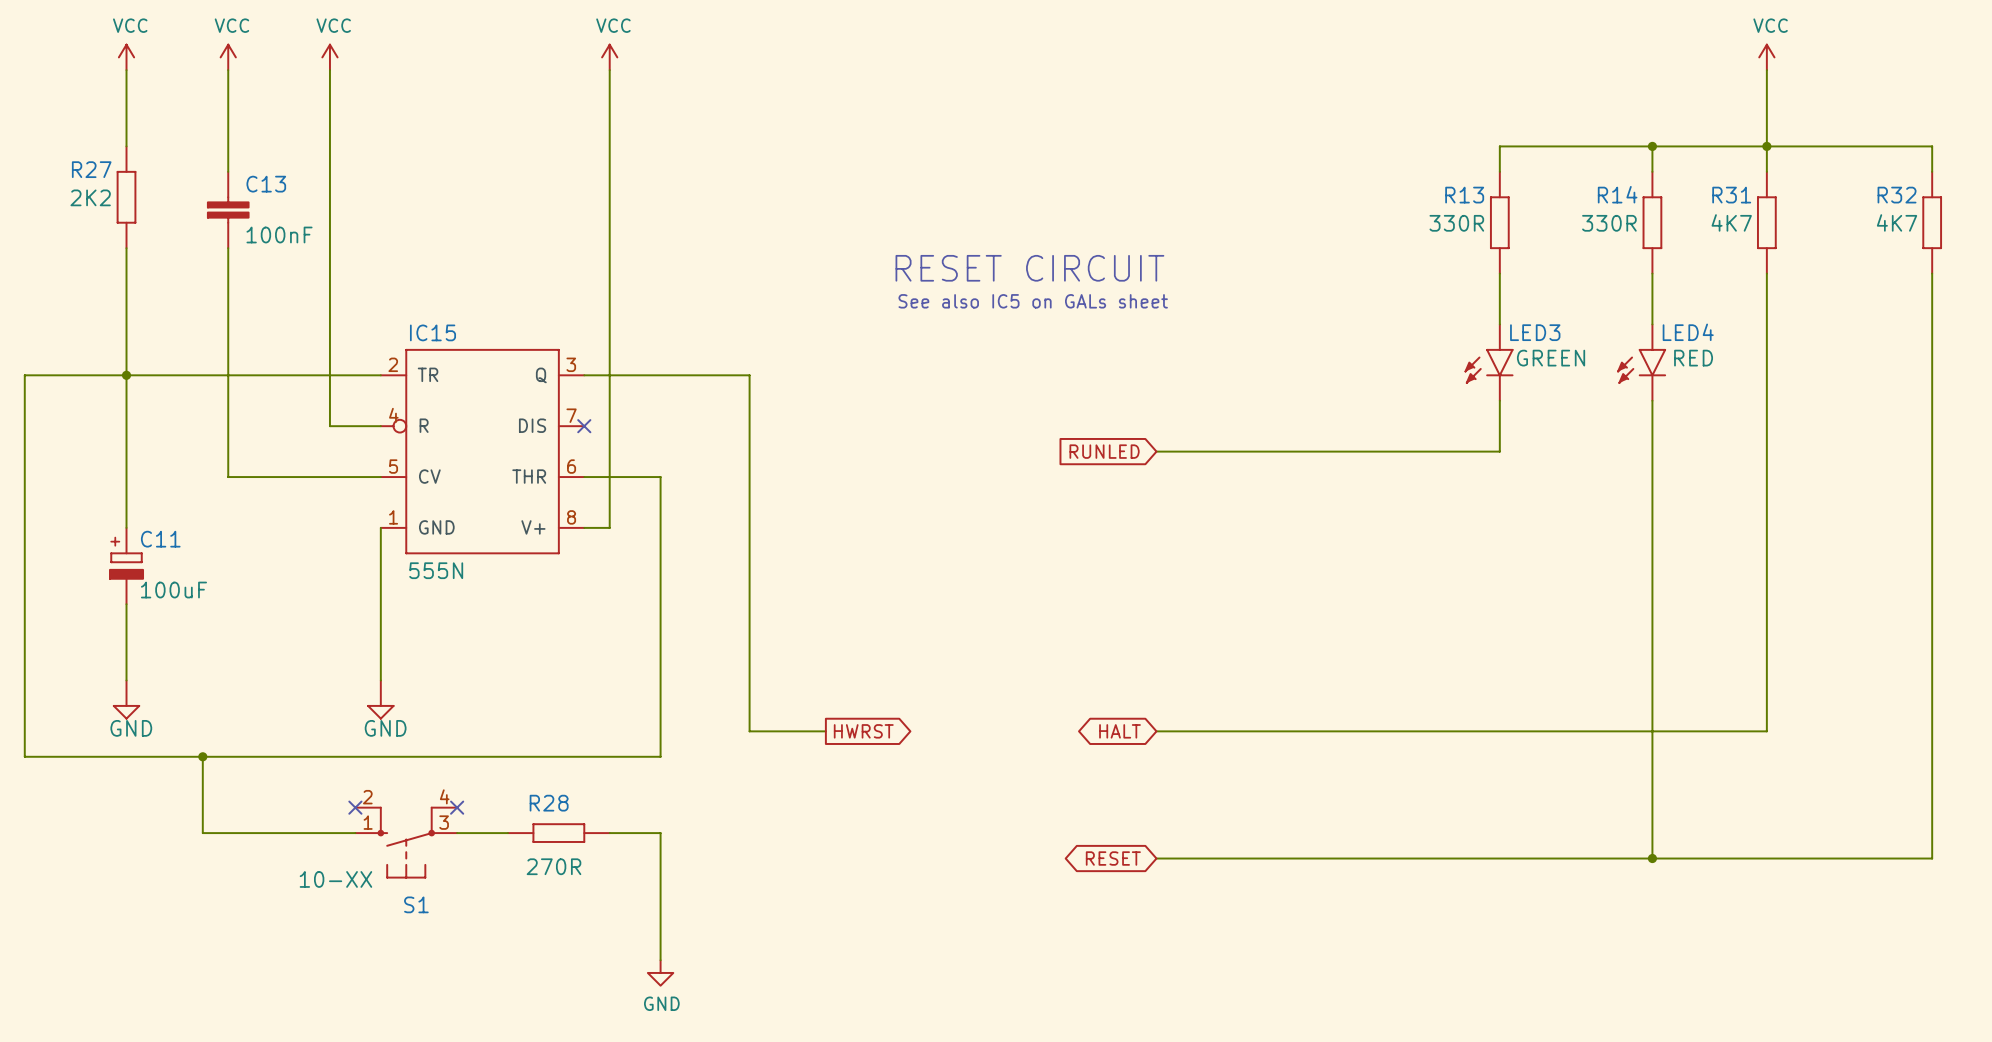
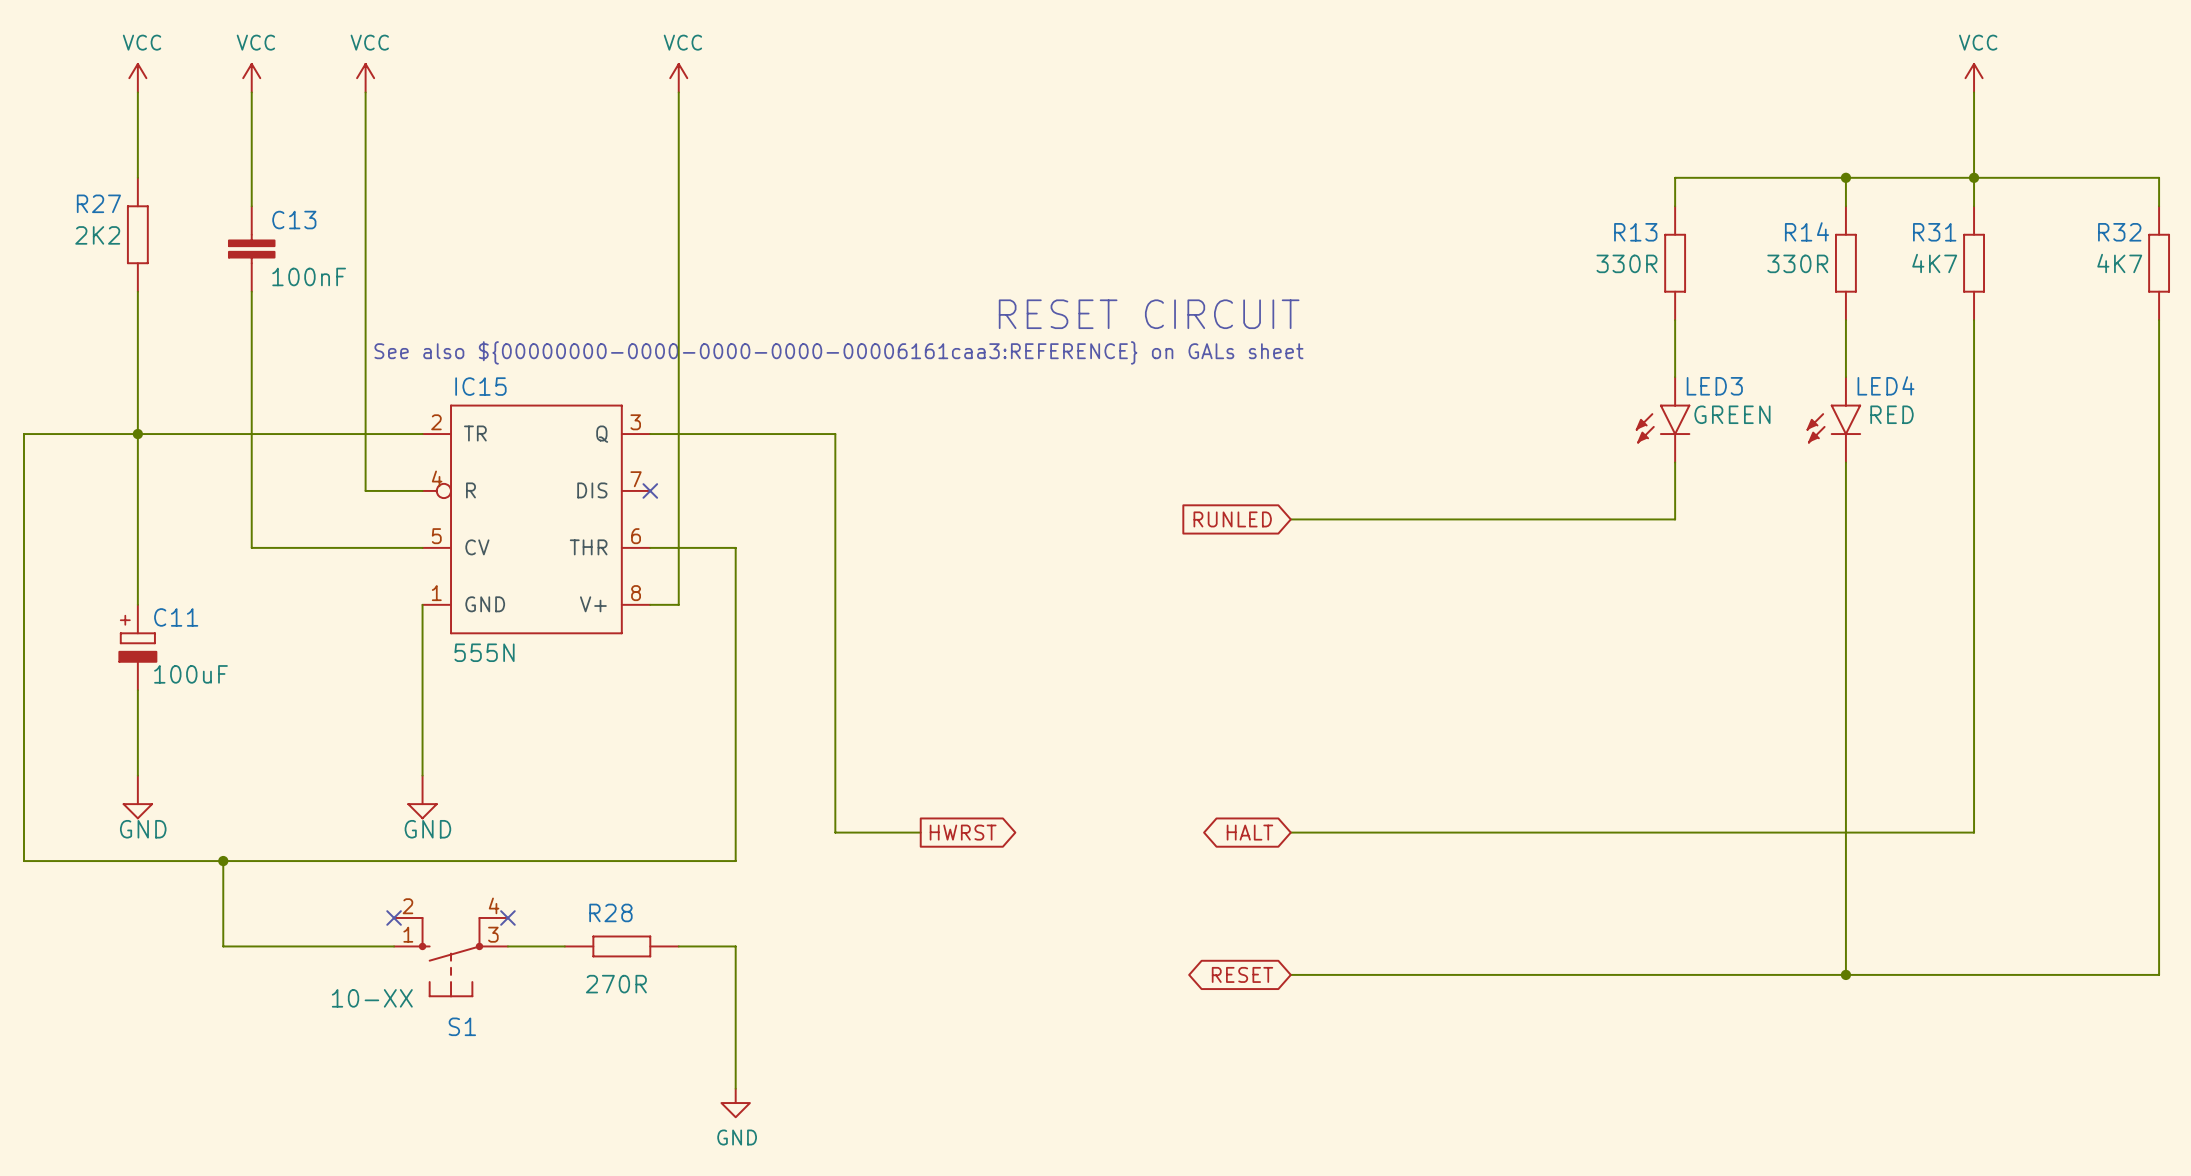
text: See also IC5 on GALs sheet (1033, 301) -> See also ${00000000-0000-0000-0000-00006161caa3:REFERENCE} on GALs sheet (838, 352)

